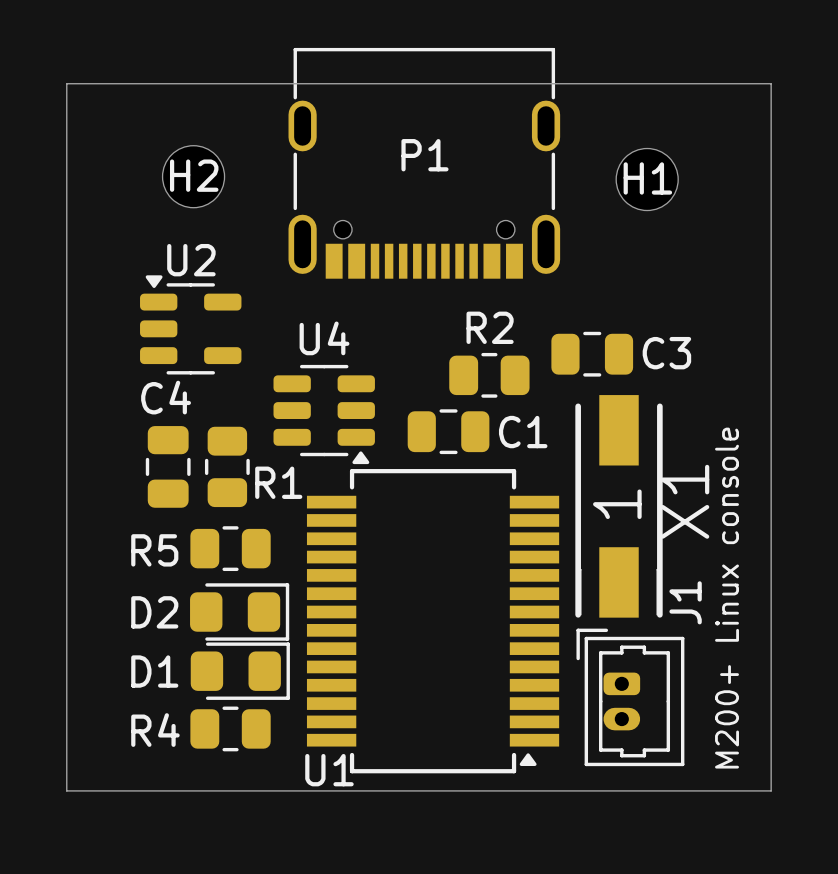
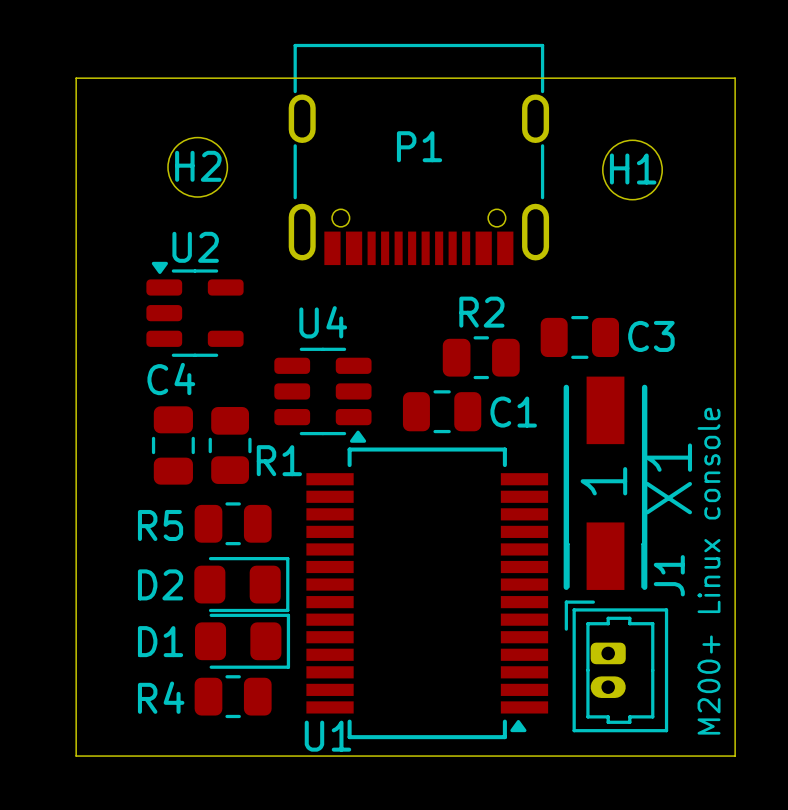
board edge: (754, 83) (771, 83) (771, 790) (754, 790) -> (735, 78) (735, 756)

